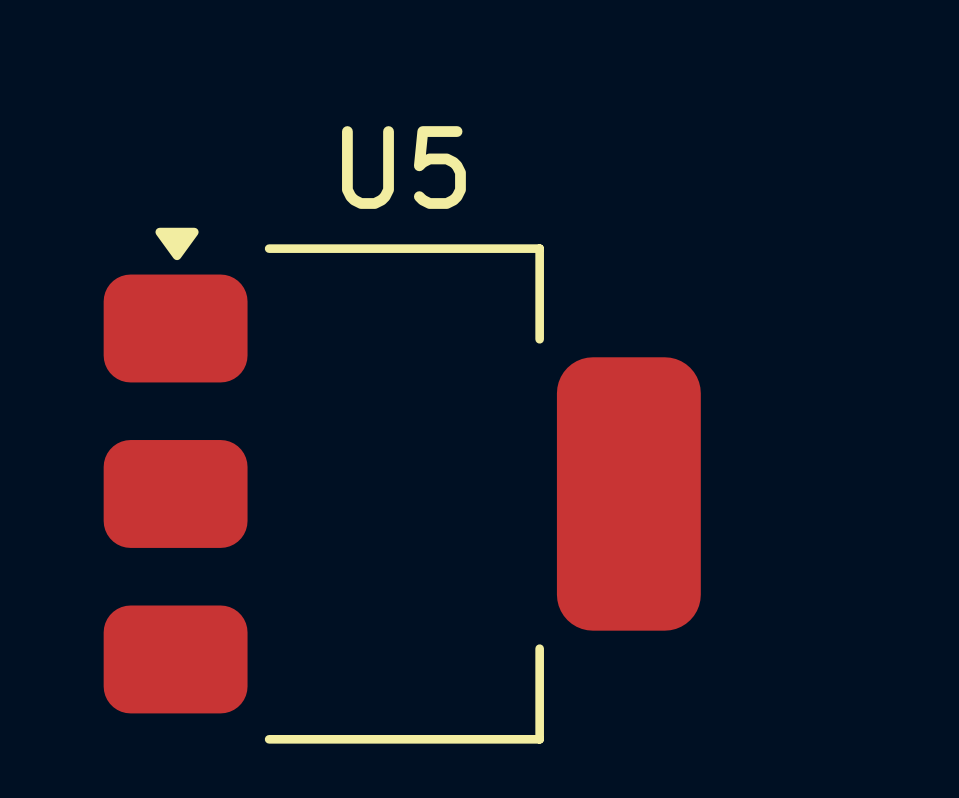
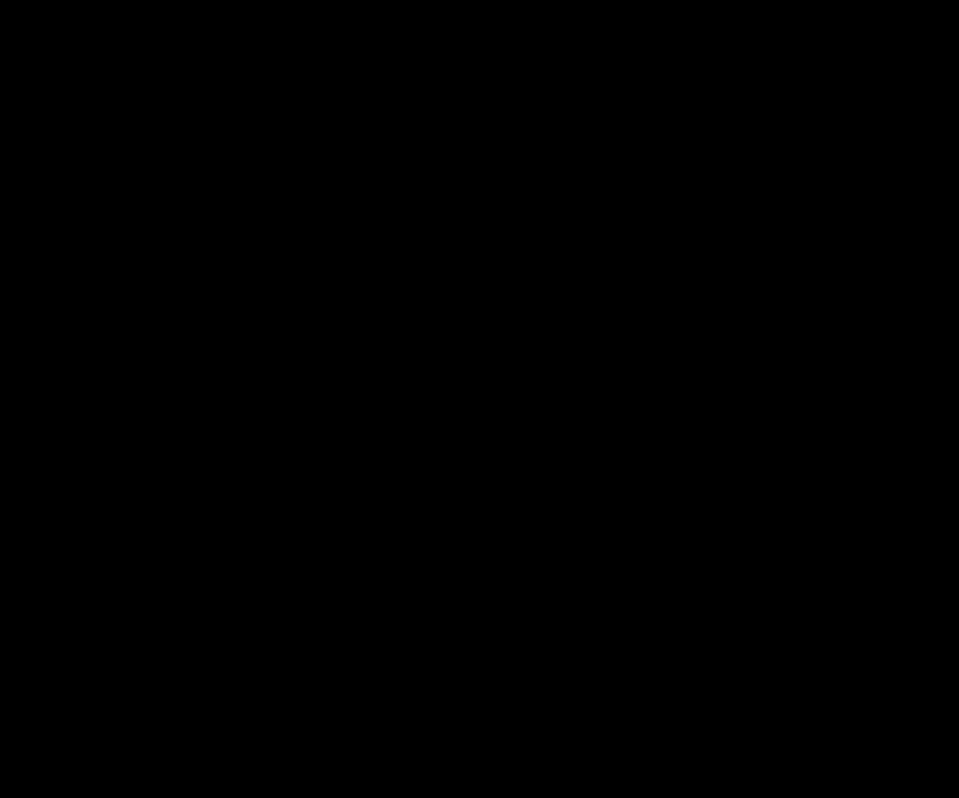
U5: (402, 485) -> none

